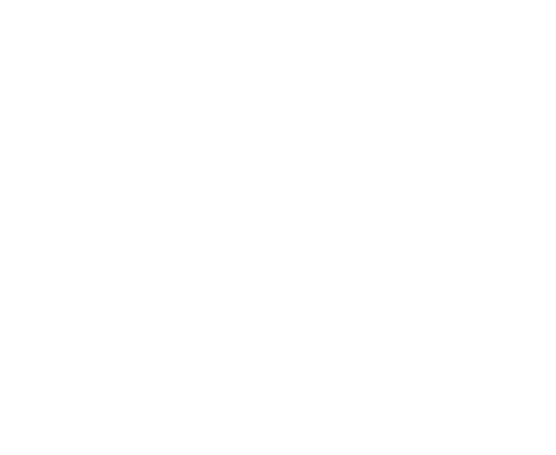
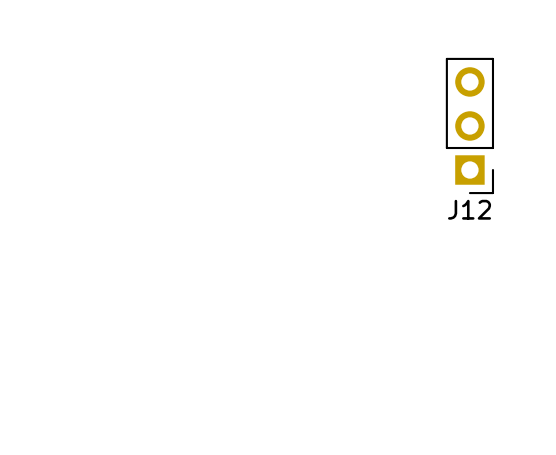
J12: none -> (469, 125)

